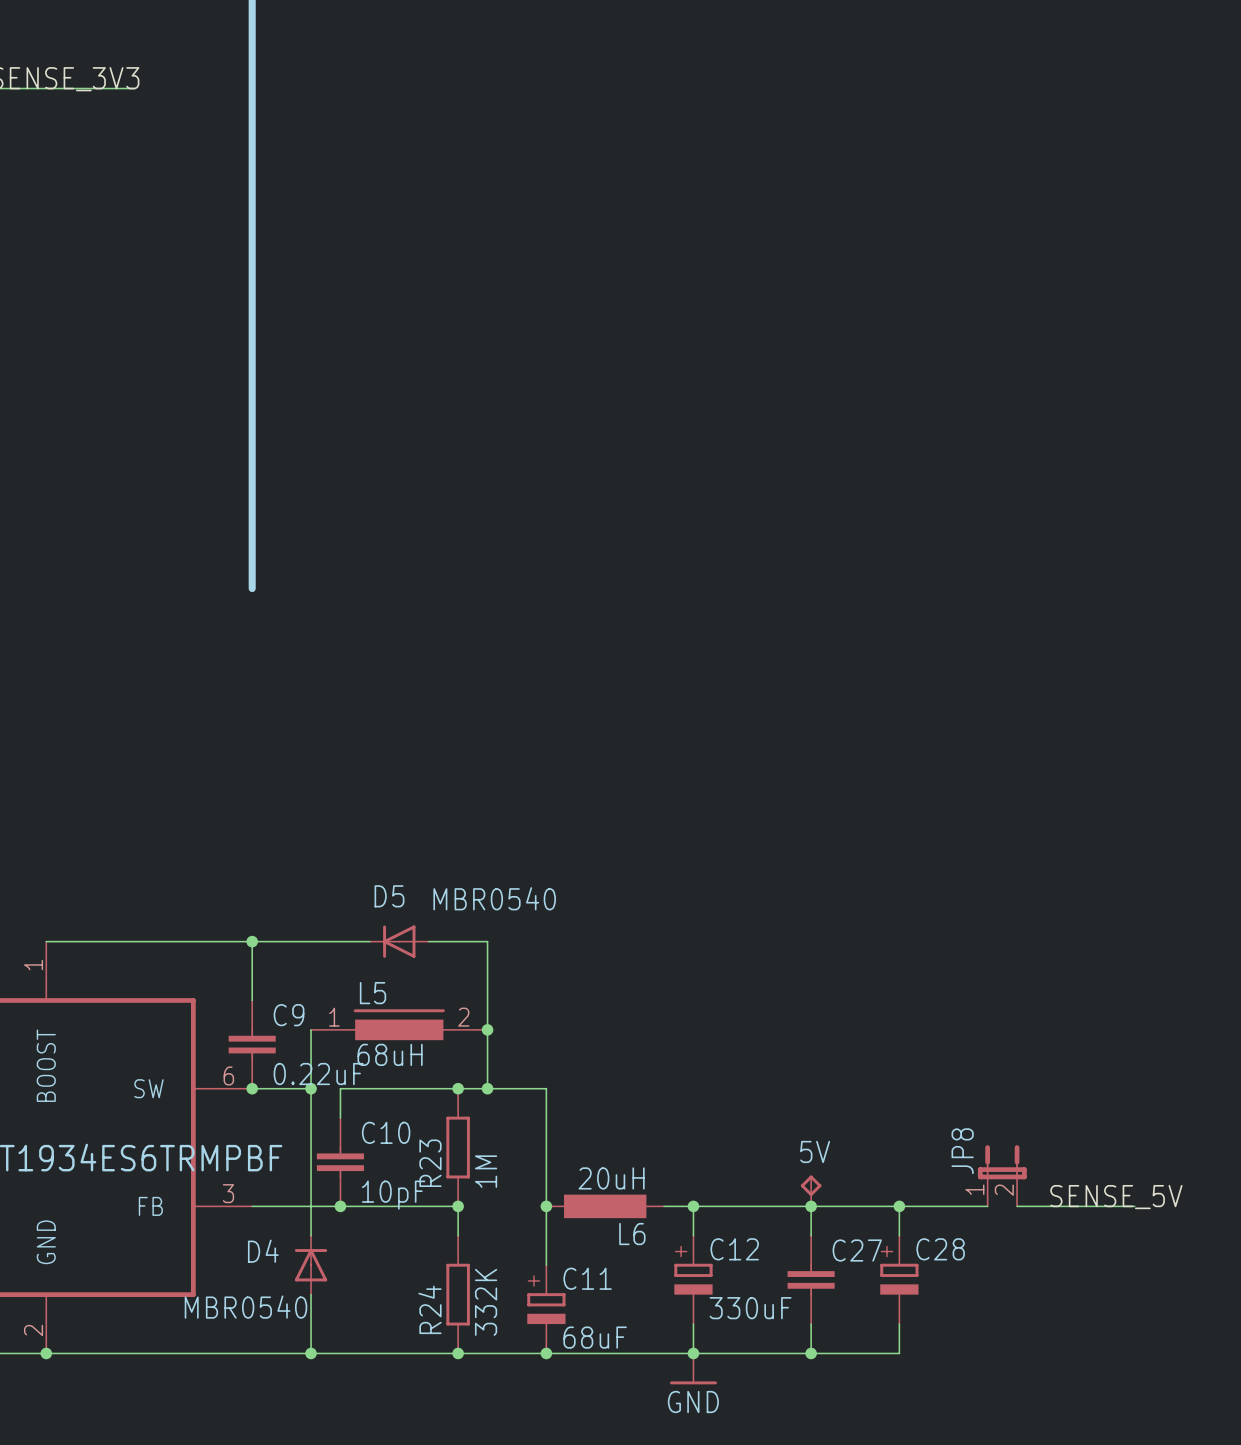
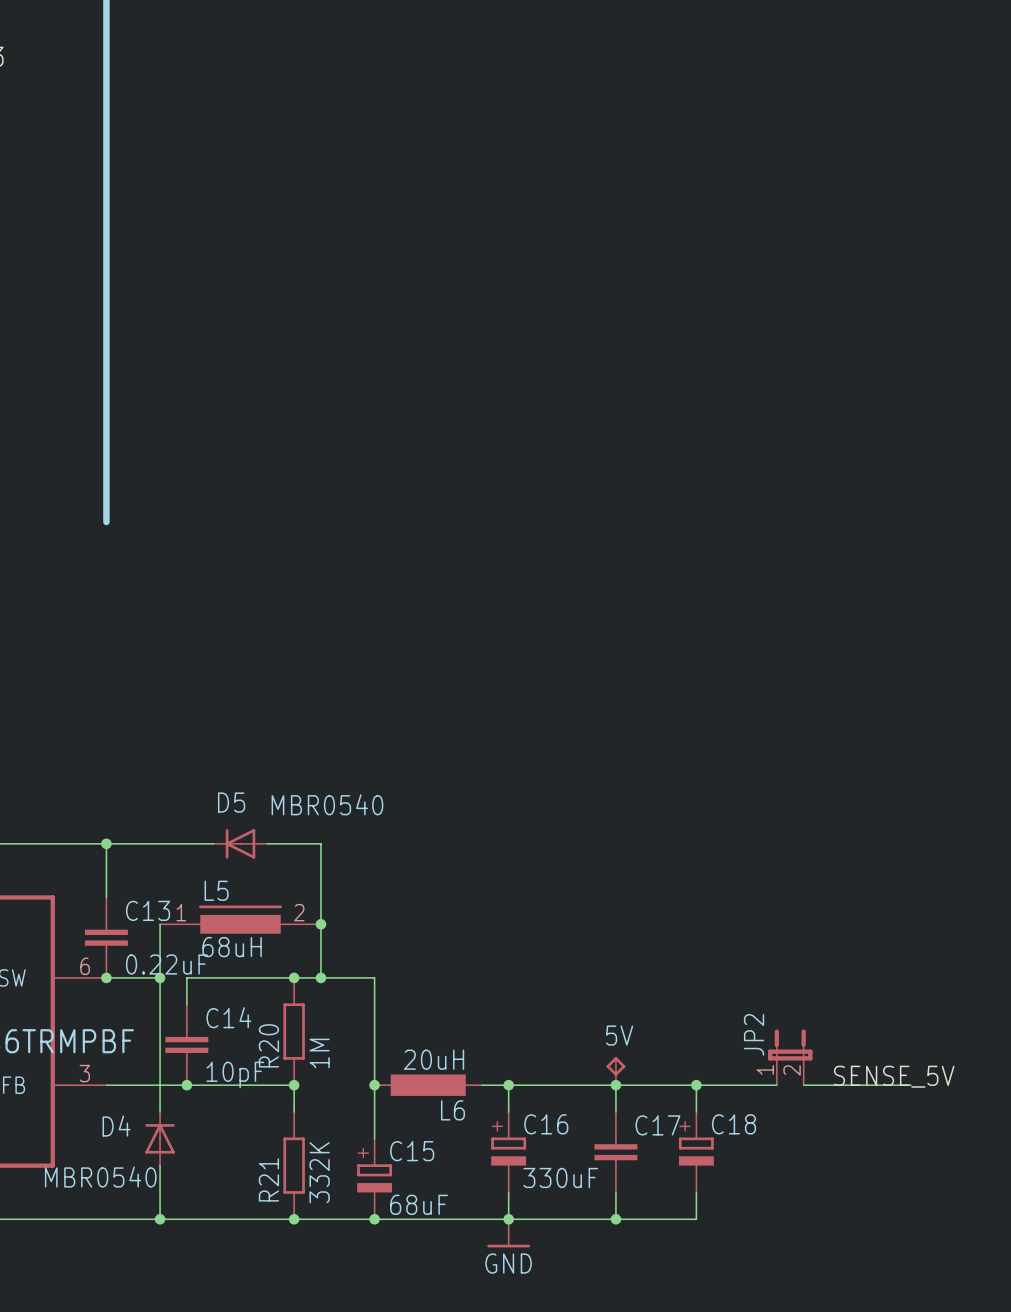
C9 name: C9 (289, 1015) -> C13 (148, 910)
C10 name: C10 (386, 1132) -> C14 (228, 1017)
JP8 name: JP8 (962, 1151) -> JP2 (754, 1034)
R23 name: R23 (430, 1163) -> R20 (268, 1045)
C12 name: C12 (734, 1249) -> C16 (546, 1124)
C28 name: C28 (940, 1249) -> C18 (733, 1124)
C27 name: C27 (857, 1250) -> C17 (657, 1125)
C11 name: C11 (587, 1278) -> C15 (412, 1151)
R24 name: R24 (429, 1309) -> R21 (268, 1179)

